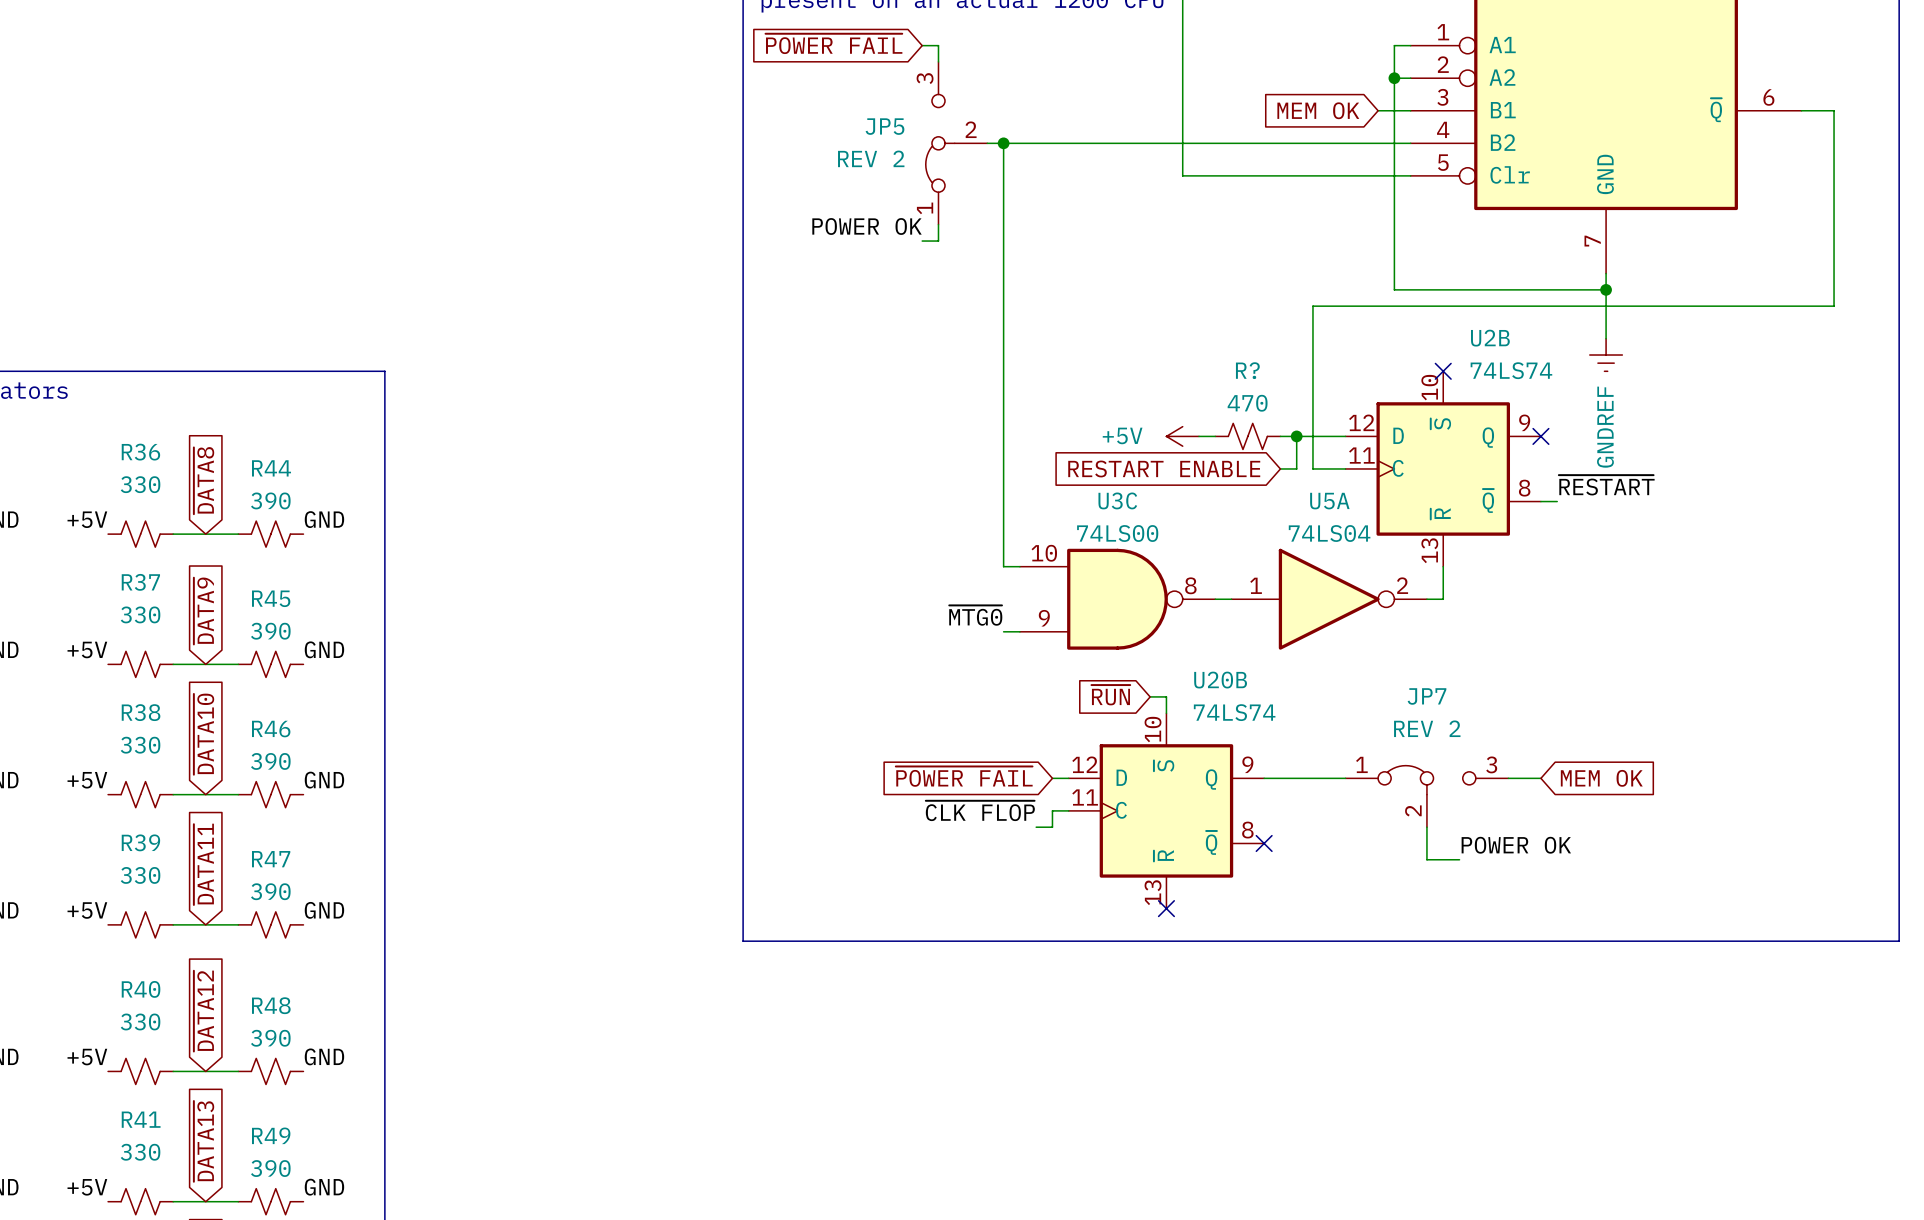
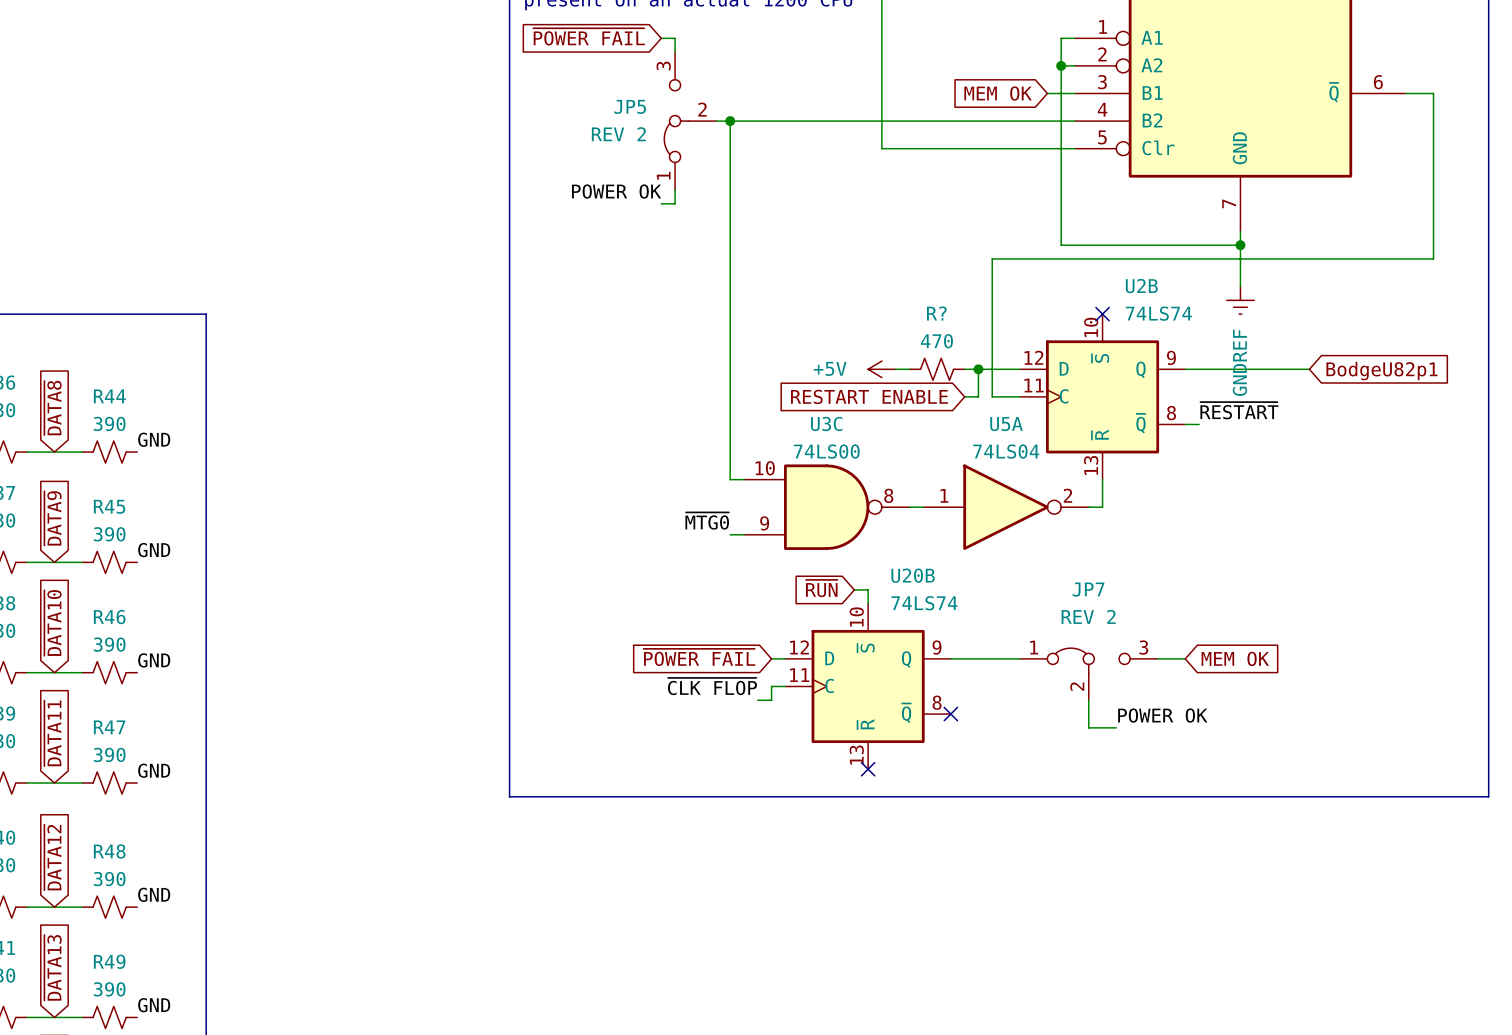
wire: none -> (1185, 369) (1309, 369)
no-connect mark: (1540, 436) -> none
global label: none -> BodgeU82p1 (1381, 371)

